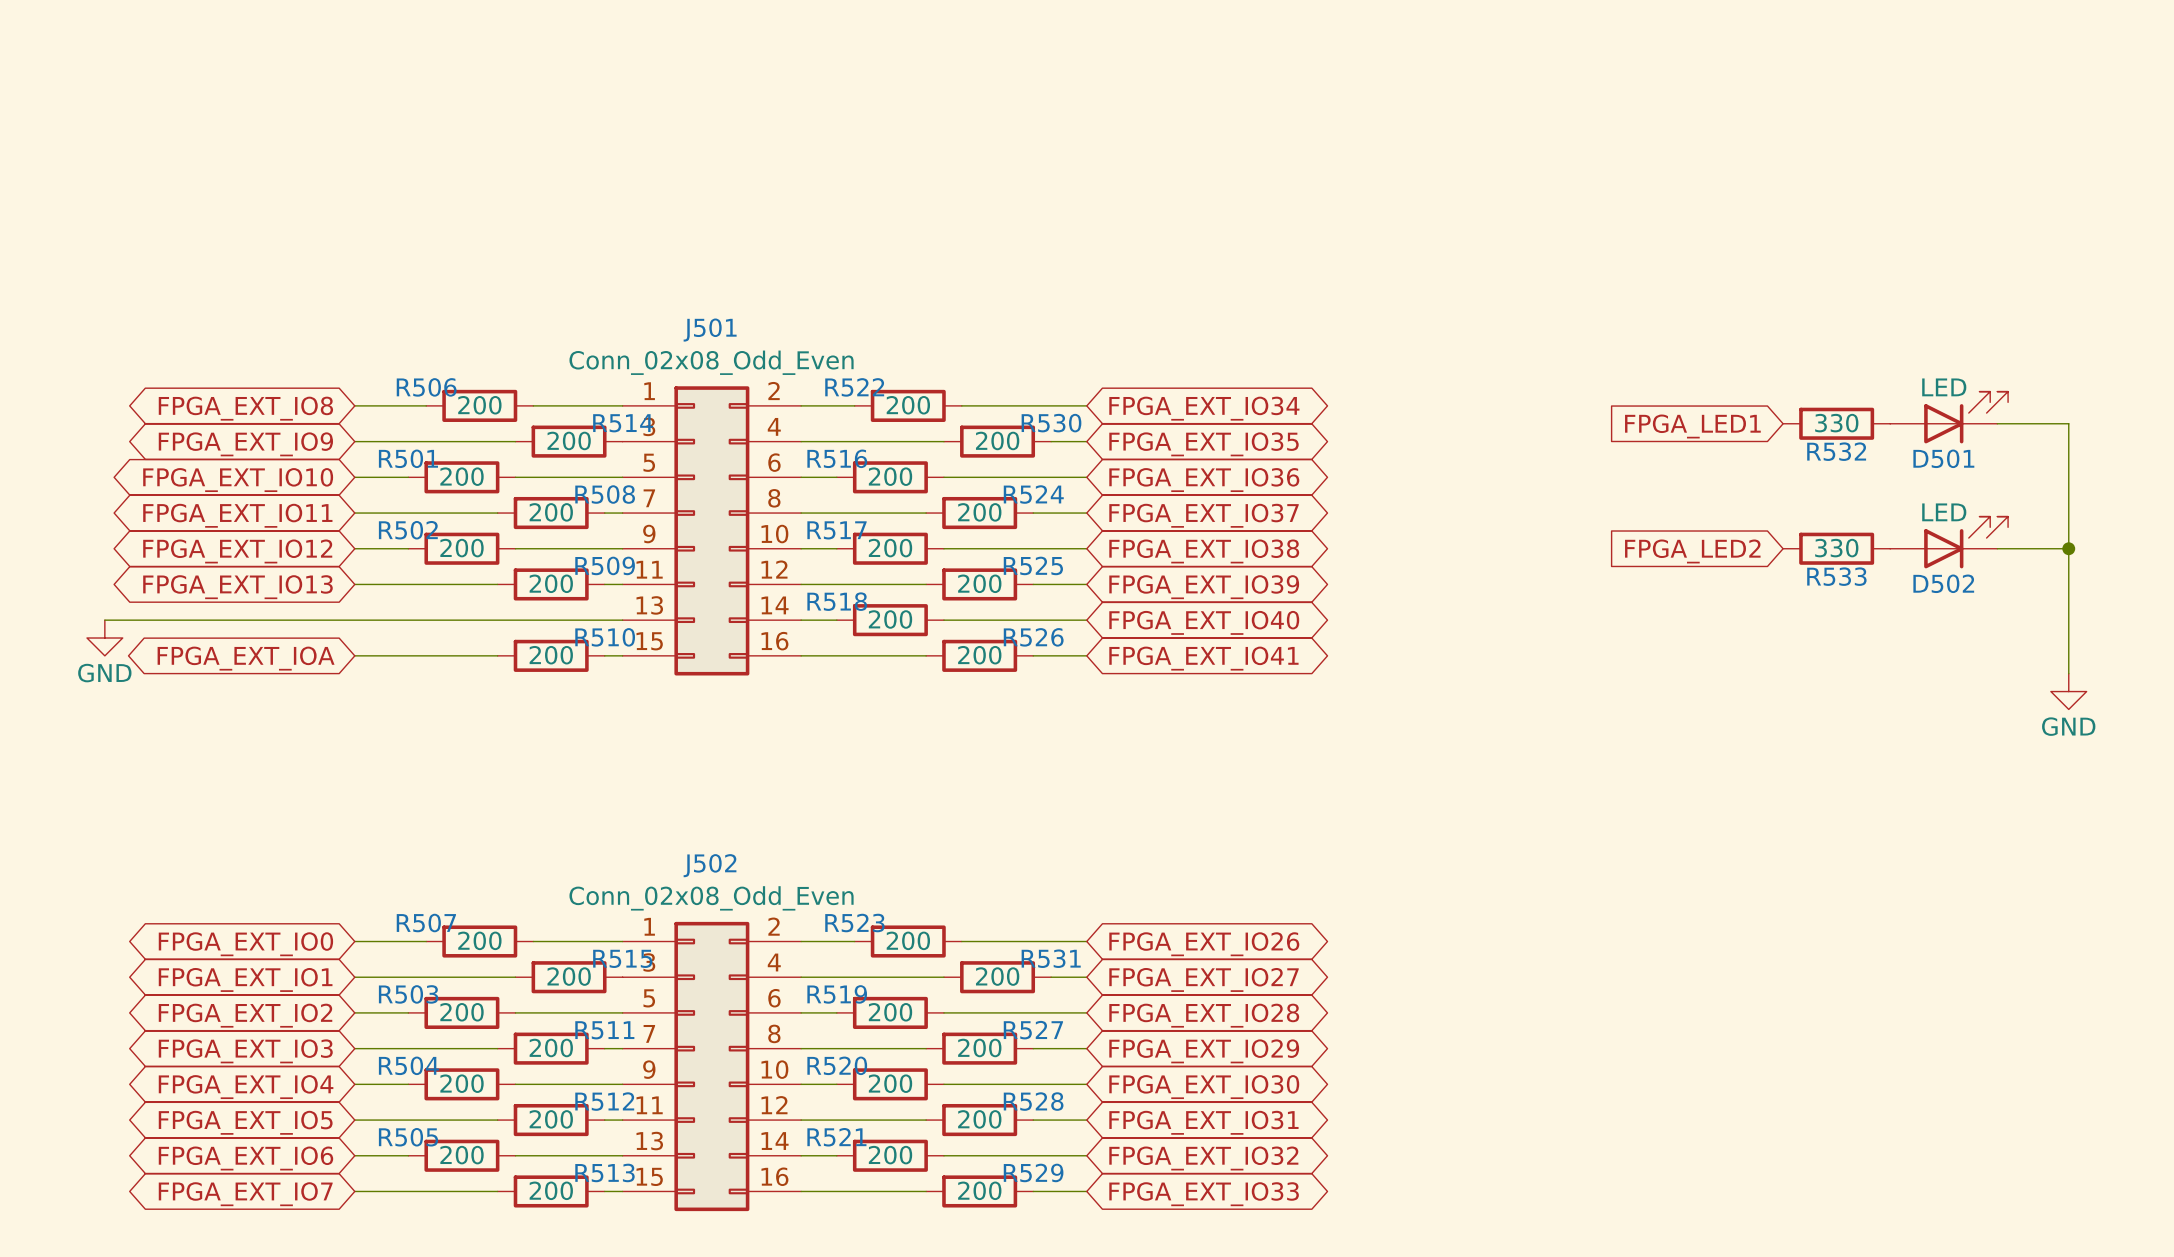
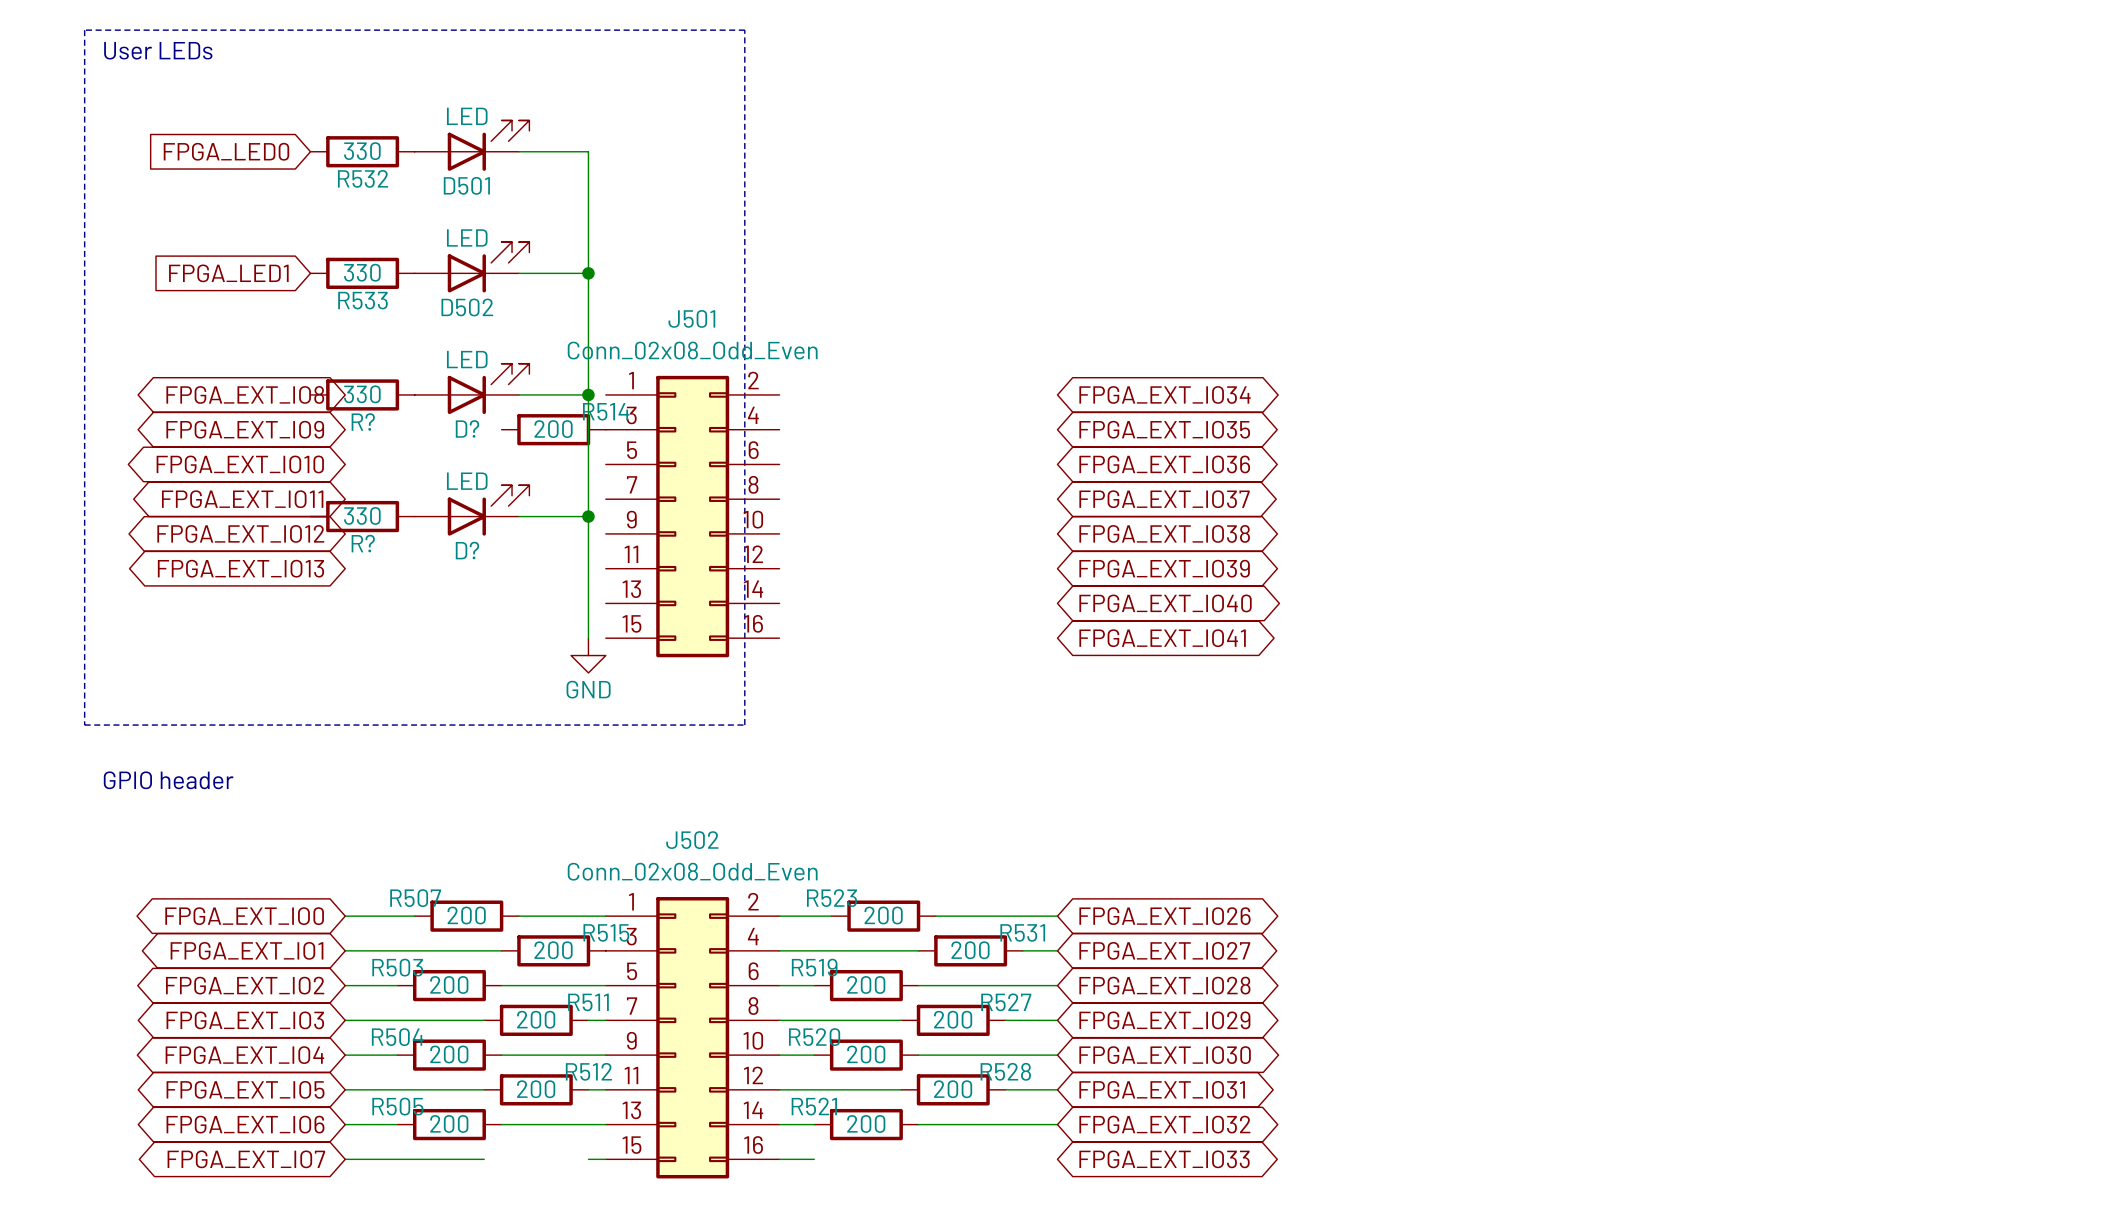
line: none -> (84, 30) (84, 725) (744, 725) (744, 30) (84, 30)
text: none -> User LEDs (158, 50)
global label: none -> FPGA_LED0 (226, 151)
junction: none -> (588, 273)
global label: none -> FPGA_LED1 (228, 273)
D?: none -> LED (472, 388)
wire: (354, 405) (426, 405) -> (518, 273) (588, 273)
R?: none -> 330 (362, 394)
R506: 200 (479, 405) -> none
wire: (604, 405) (622, 405) -> none
junction: none -> (588, 394)
wire: (801, 405) (854, 405) -> none
R522: 200 (908, 405) -> none
wire: (961, 405) (1086, 405) -> none
D501 position: (1949, 417) -> (472, 145)
R532 position: (1836, 423) -> (362, 151)
wire: (1997, 423) (2068, 423) (2068, 673) -> none
global label: FPGA_LED1 (1692, 426) -> none
wire: (354, 441) (515, 441) -> none
wire: (801, 441) (943, 441) -> none
R530: 200 (997, 441) -> none
wire: (1051, 441) (1086, 441) -> none
wire: (354, 477) (408, 477) -> none
R501: 200 (461, 477) -> none
wire: (515, 477) (622, 477) -> none
wire: (801, 477) (836, 477) -> none
R516: 200 (890, 477) -> none
wire: (943, 477) (1086, 477) -> none
wire: (354, 513) (497, 513) -> none
R508: 200 (551, 513) -> none
wire: (604, 513) (622, 513) -> none
wire: (801, 513) (926, 513) -> none
R524: 200 (979, 513) -> none
wire: (1033, 513) (1086, 513) -> none
D?: none -> LED (472, 510)
R?: none -> 330 (362, 516)
wire: none -> (518, 516) (588, 516)
junction: none -> (588, 516)
D502 position: (1949, 542) -> (472, 267)
wire: (354, 548) (408, 548) -> none
R502: 200 (461, 548) -> none
wire: (515, 548) (622, 548) -> none
wire: (801, 548) (836, 548) -> none
R517: 200 (890, 548) -> none
wire: (943, 548) (1086, 548) -> none
R533 position: (1836, 548) -> (362, 273)
wire: (1997, 548) (2068, 548) -> none
junction: (2068, 548) -> none
global label: FPGA_LED2 (1692, 551) -> none
wire: (354, 584) (497, 584) -> none
R509: 200 (551, 584) -> none
wire: (604, 584) (622, 584) -> none
wire: (801, 584) (926, 584) -> none
R525: 200 (979, 584) -> none
wire: (1033, 584) (1086, 584) -> none
wire: (104, 620) (622, 620) -> none
wire: (801, 620) (836, 620) -> none
R518: 200 (890, 620) -> none
wire: (943, 620) (1086, 620) -> none
power symbol: GND (104, 638) -> none
wire: (354, 655) (497, 655) -> none
R510: 200 (551, 655) -> none
wire: (604, 655) (622, 655) -> (588, 638) (588, 151) (518, 151)
wire: (801, 655) (926, 655) -> none
R526: 200 (979, 655) -> none
wire: (1033, 655) (1086, 655) -> none
global label: FPGA_EXT_IOA (246, 658) -> none
power symbol: none -> GND (588, 655)
power symbol: GND (2068, 691) -> none
text: none -> GPIO header (168, 780)
R513: 200 (551, 1191) -> none
wire: (836, 1191) (926, 1191) -> none
R529: 200 (979, 1191) -> none
wire: (1033, 1191) (1086, 1191) -> none

